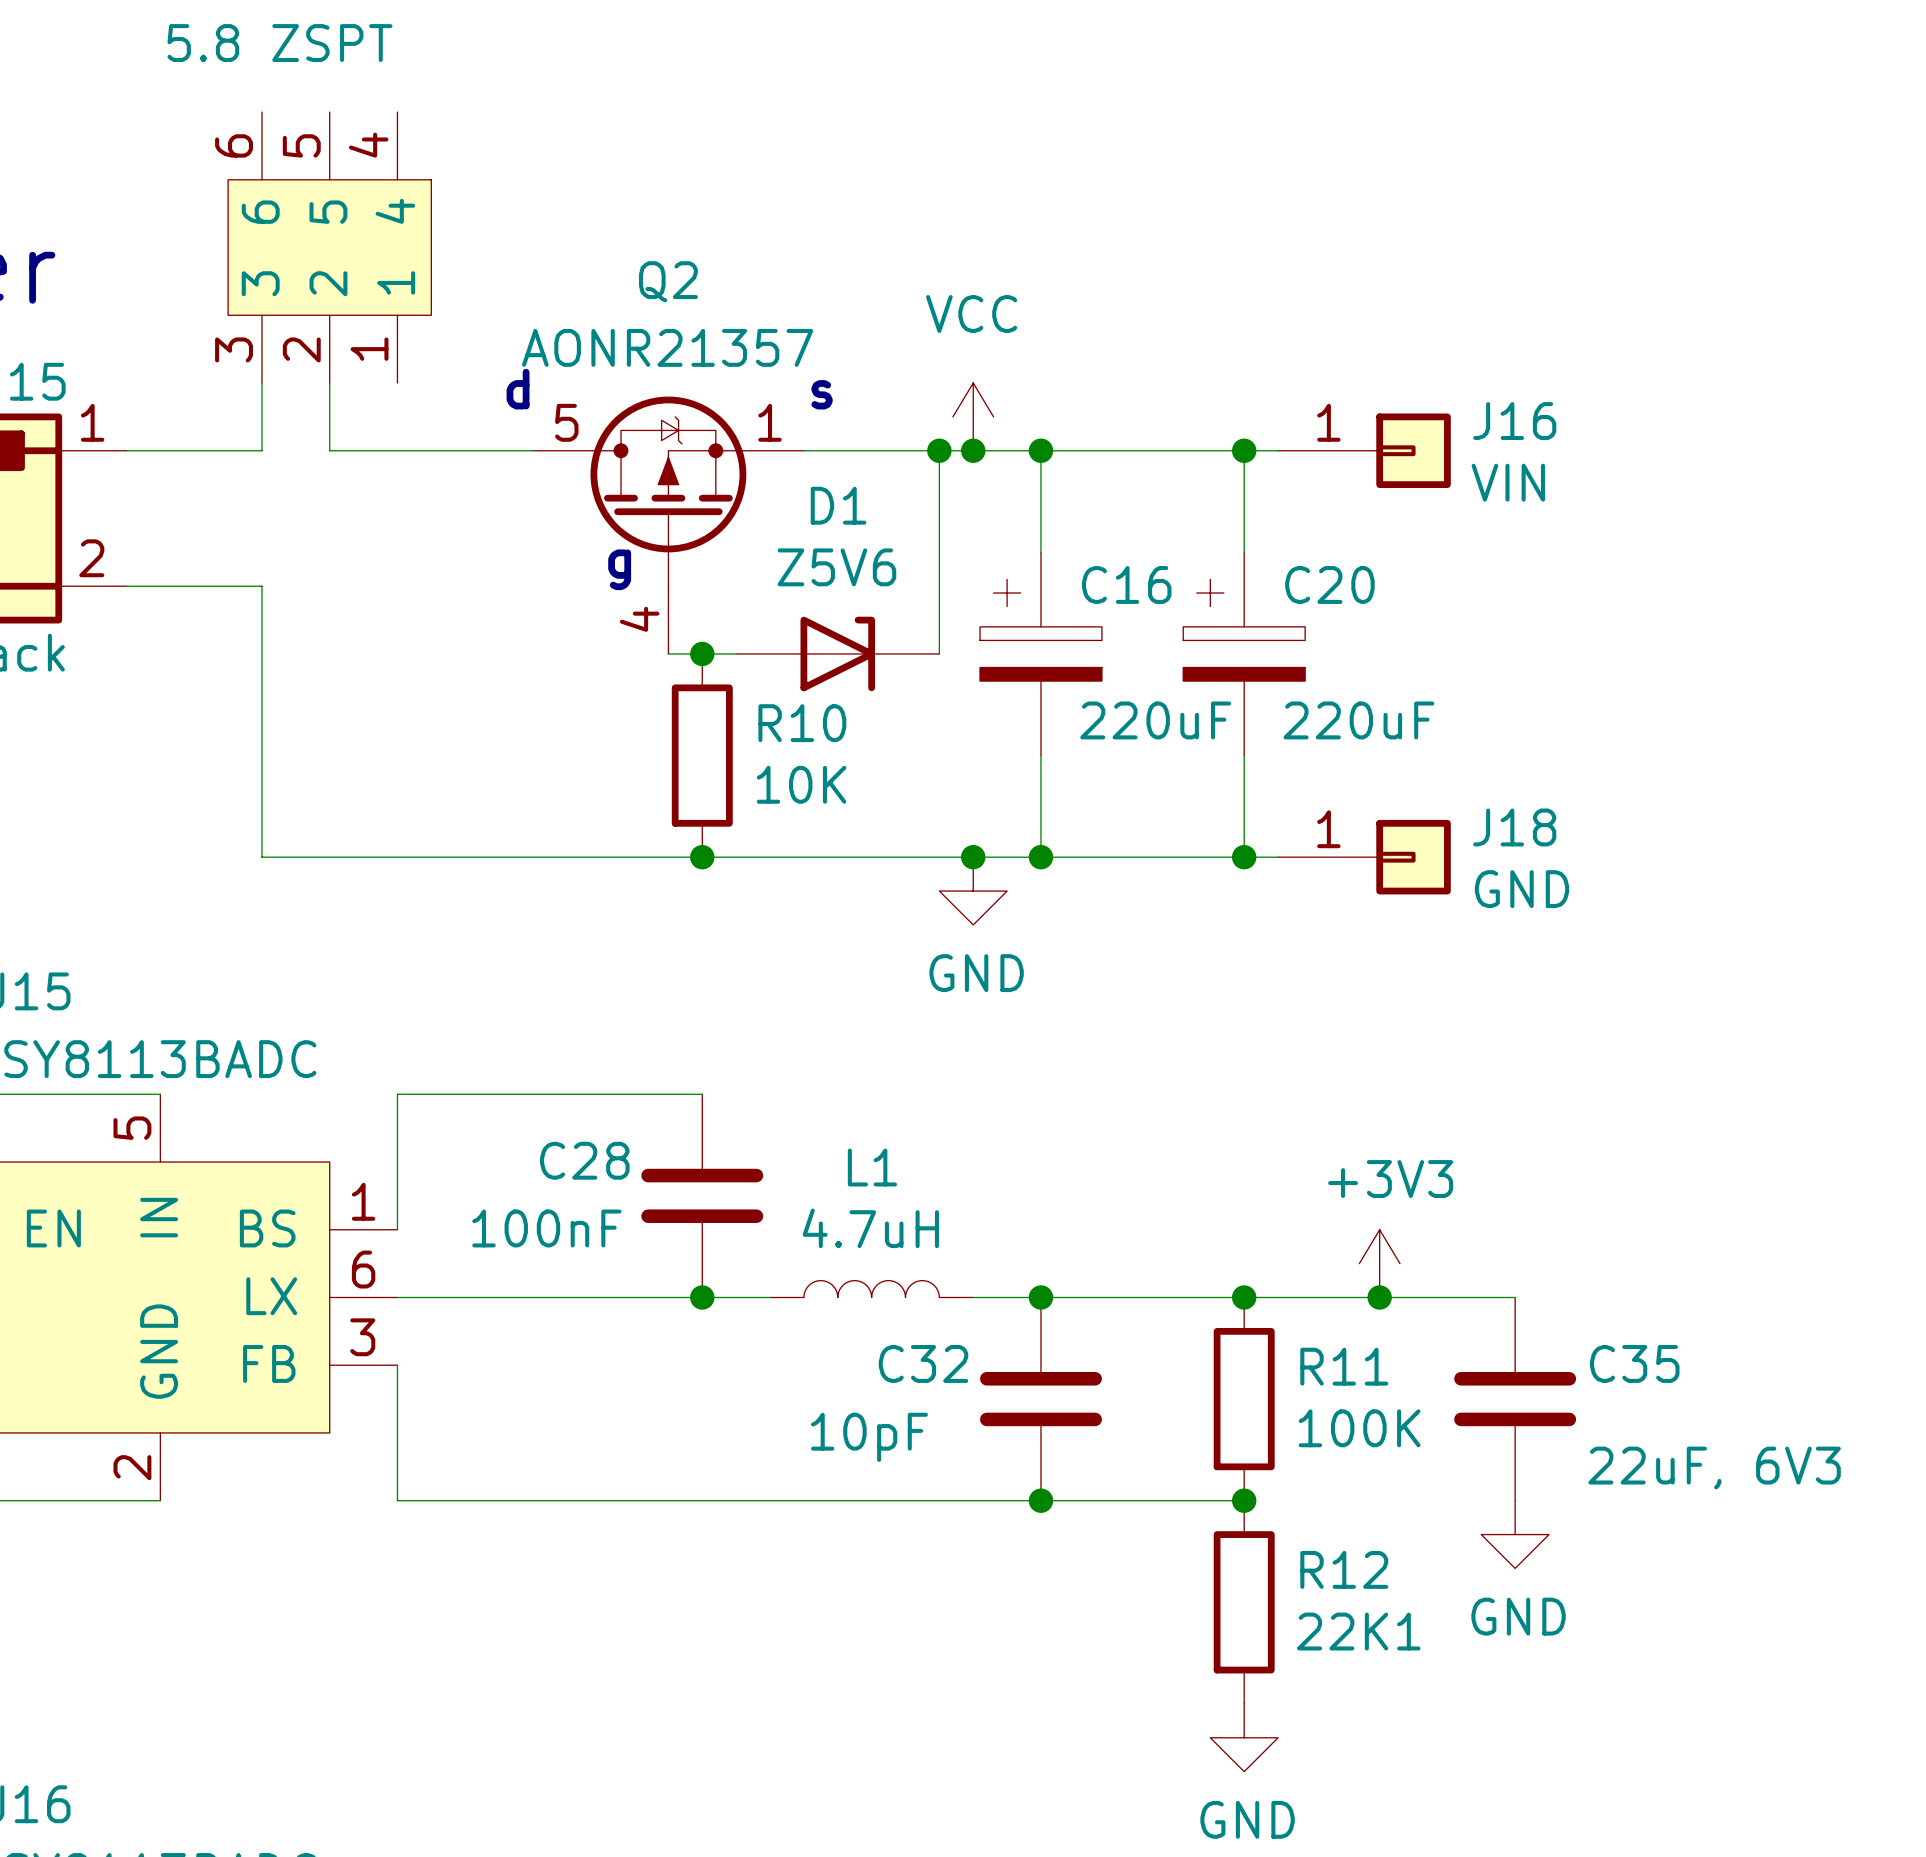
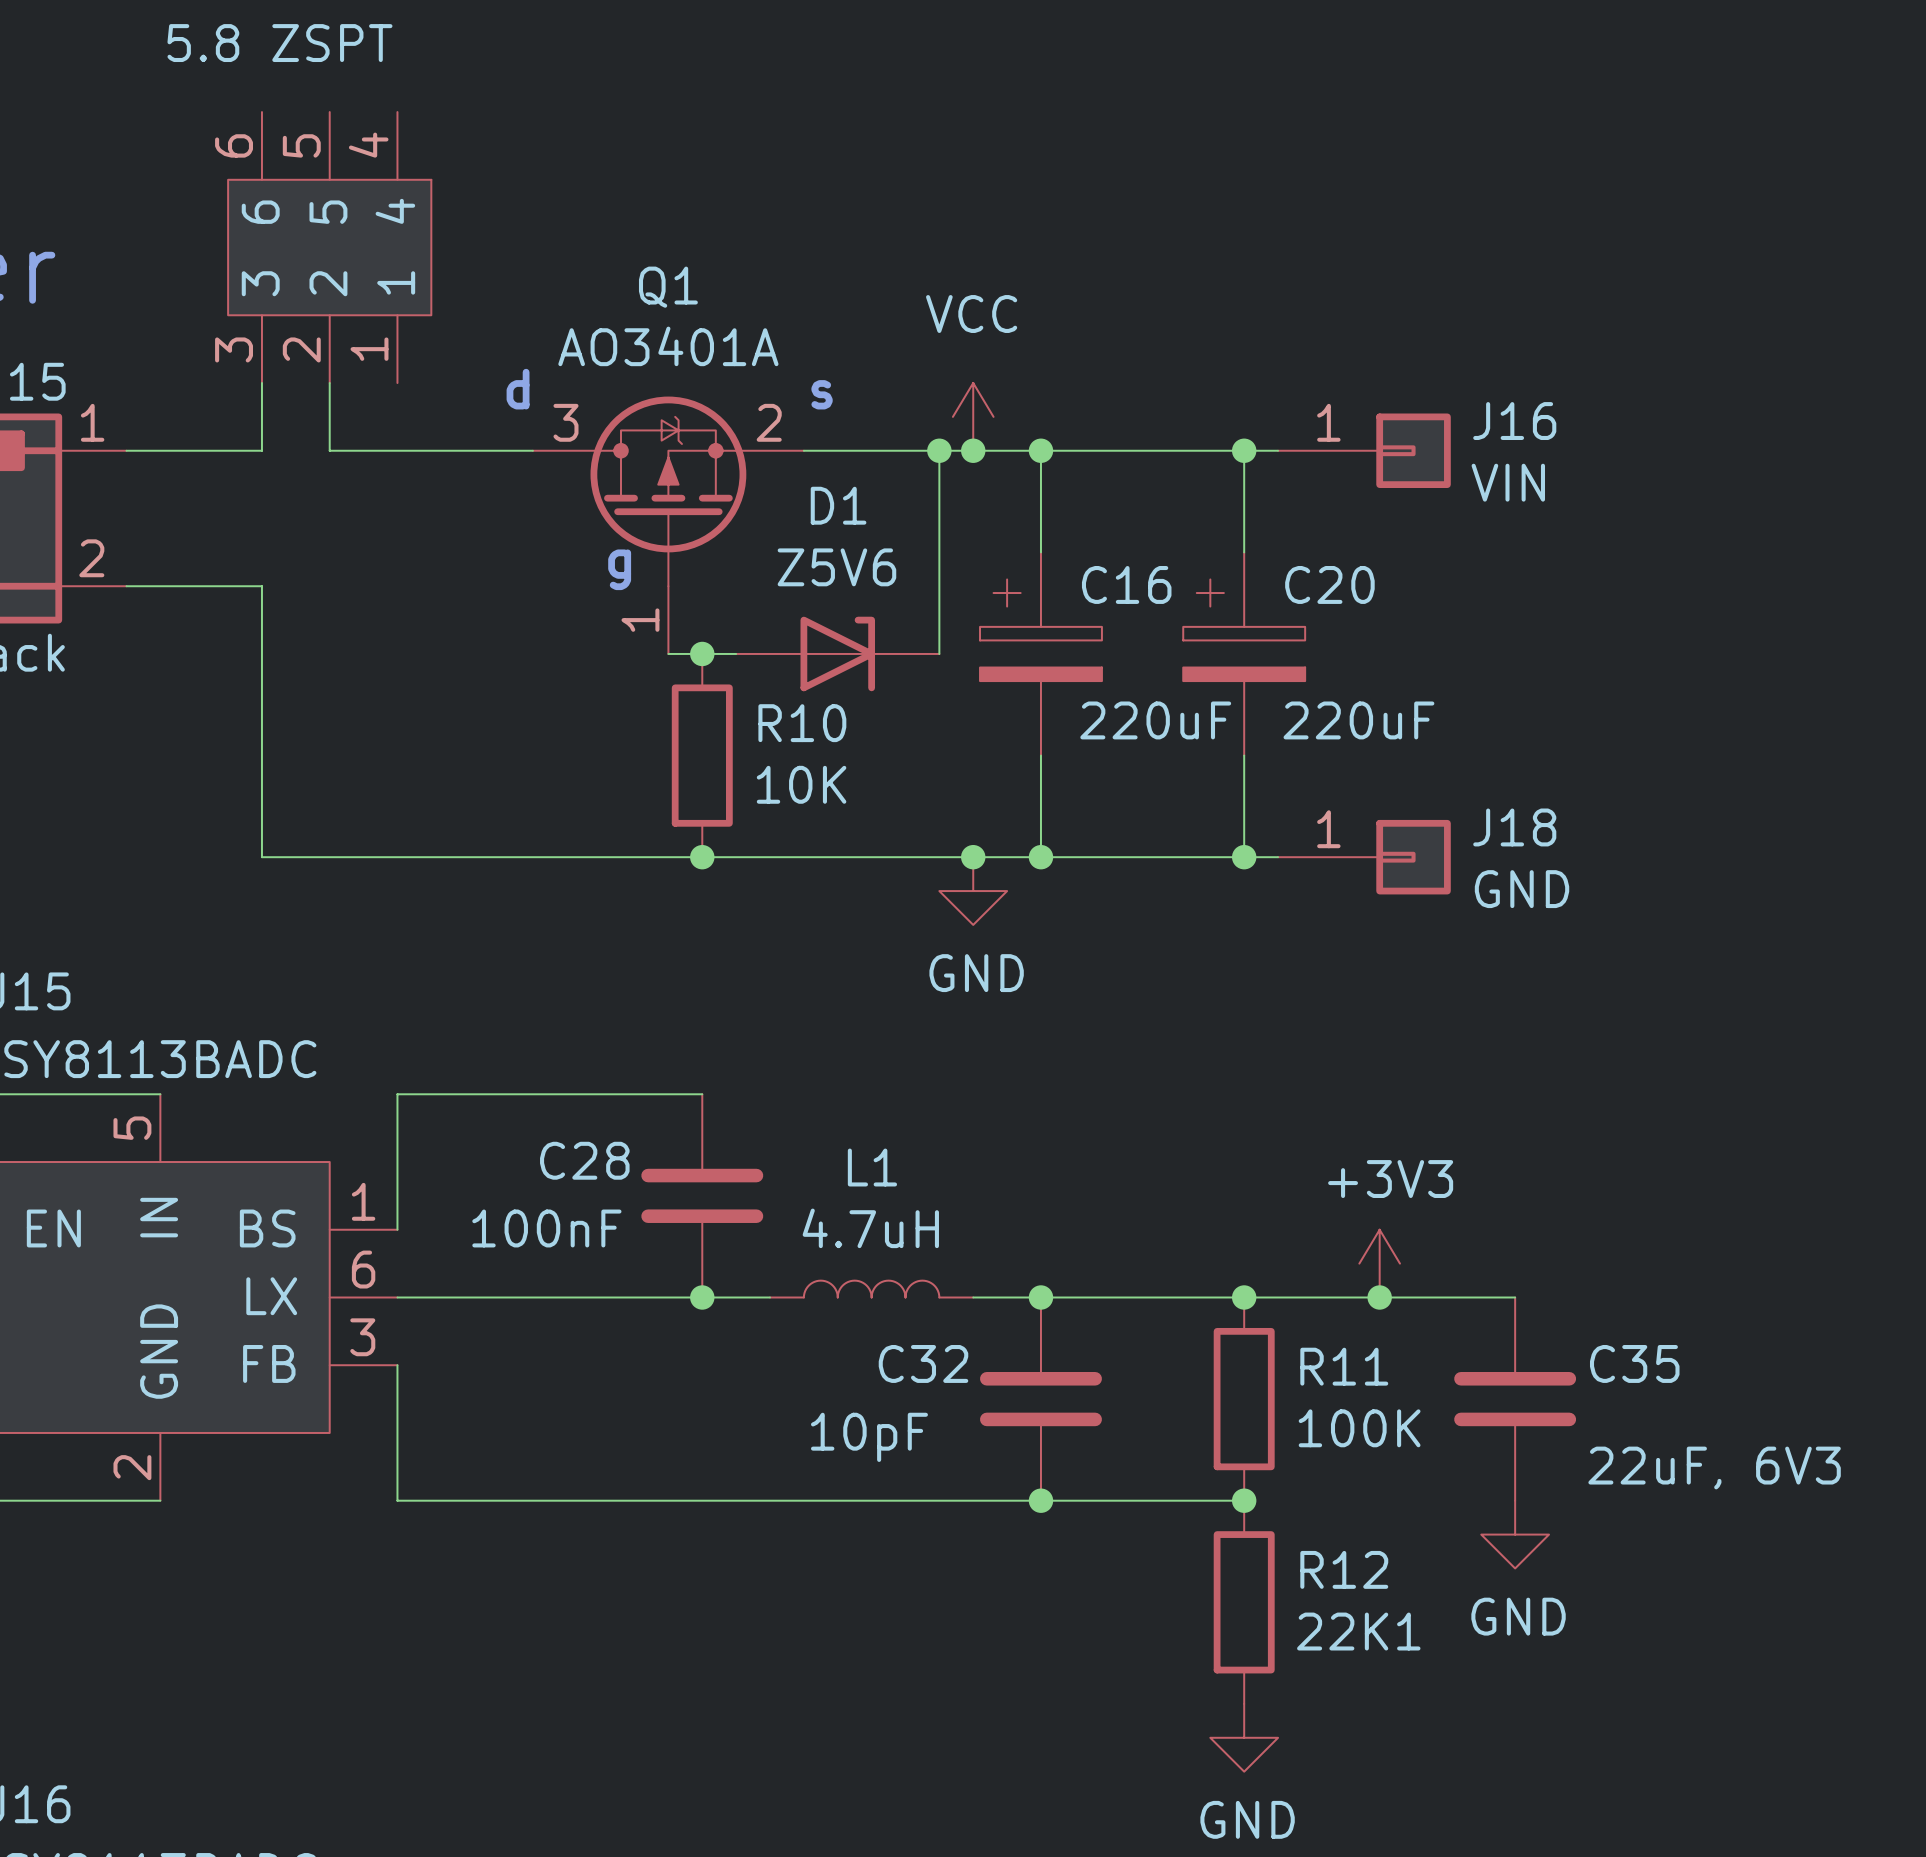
Q2 name: Q2 (668, 281) -> Q1 (668, 287)
Q2 value: AONR21357 (667, 347) -> AO3401A (668, 346)
Q2 pin number: 5 (566, 422) -> 3 (565, 422)
Q2 pin number: 1 (770, 422) -> 2 (769, 422)
Q2 pin number: 4 (639, 619) -> 1 (640, 620)

